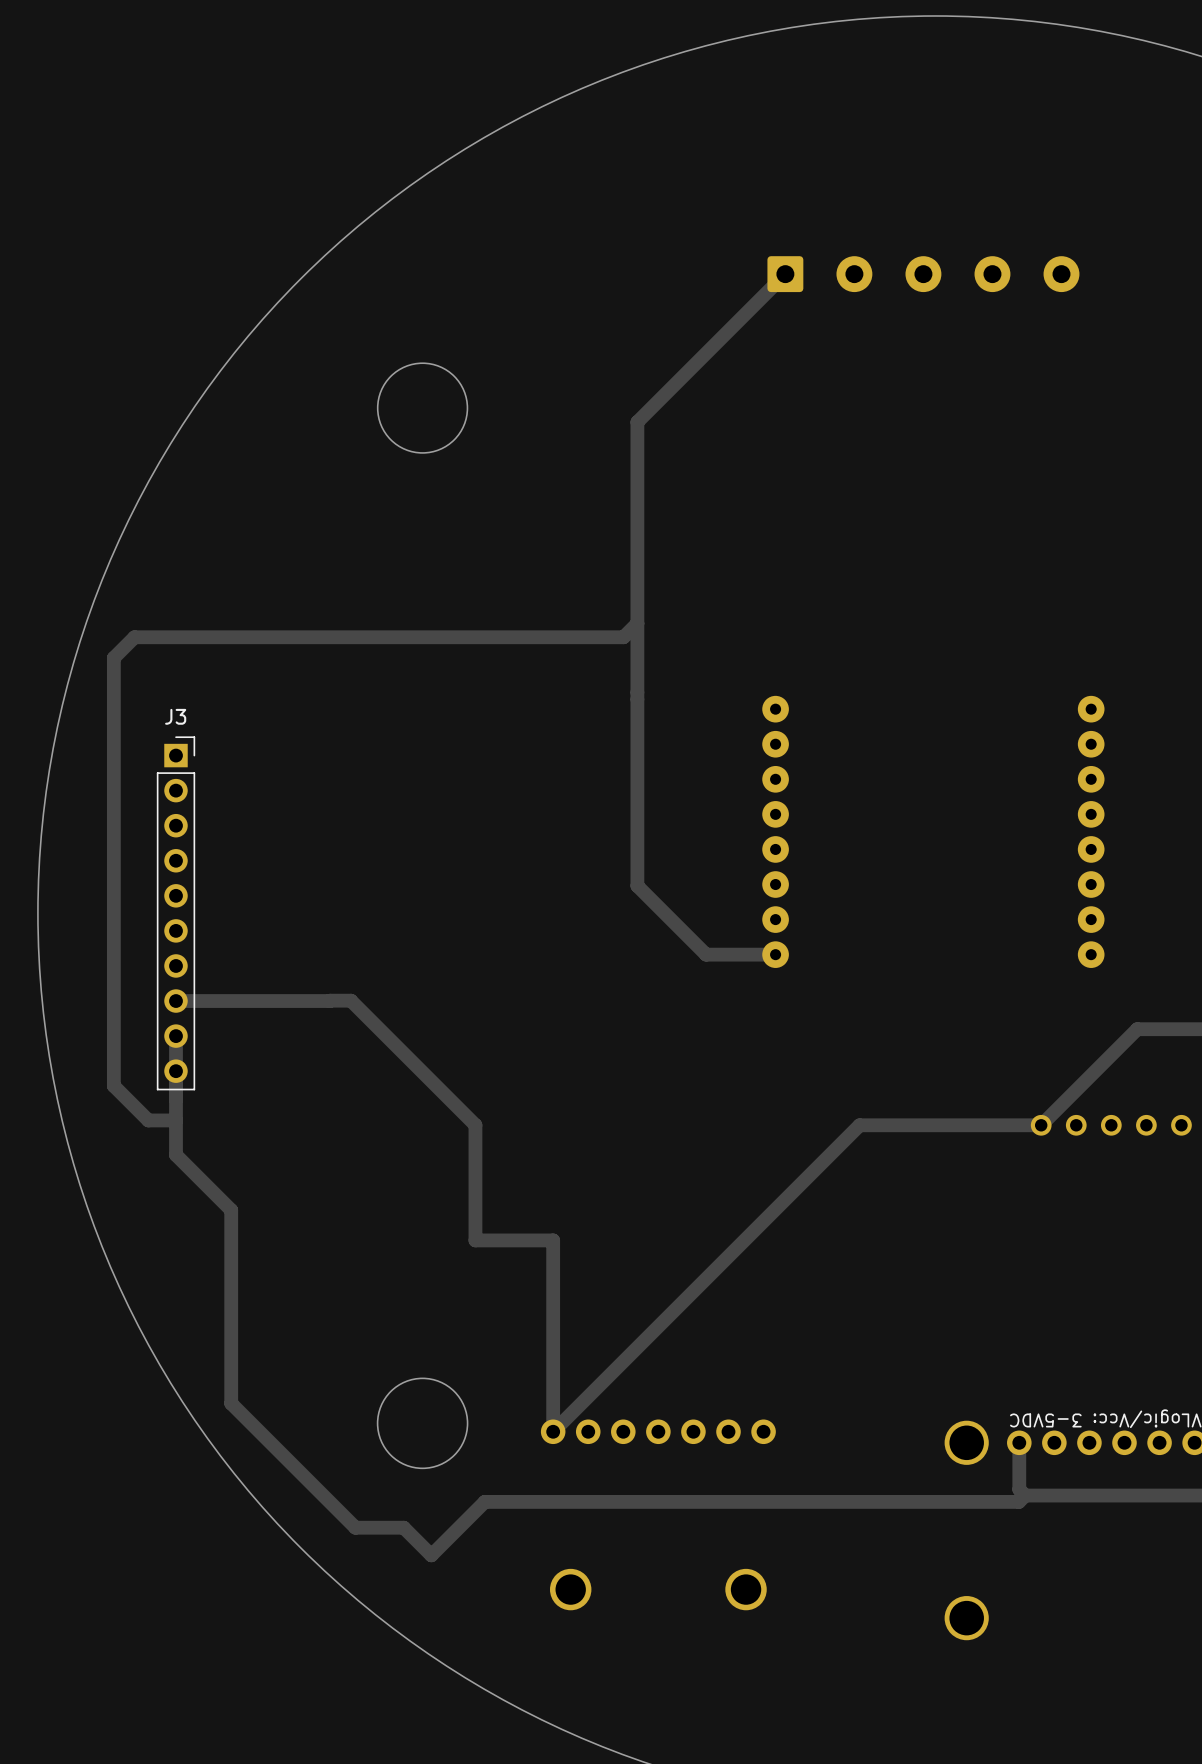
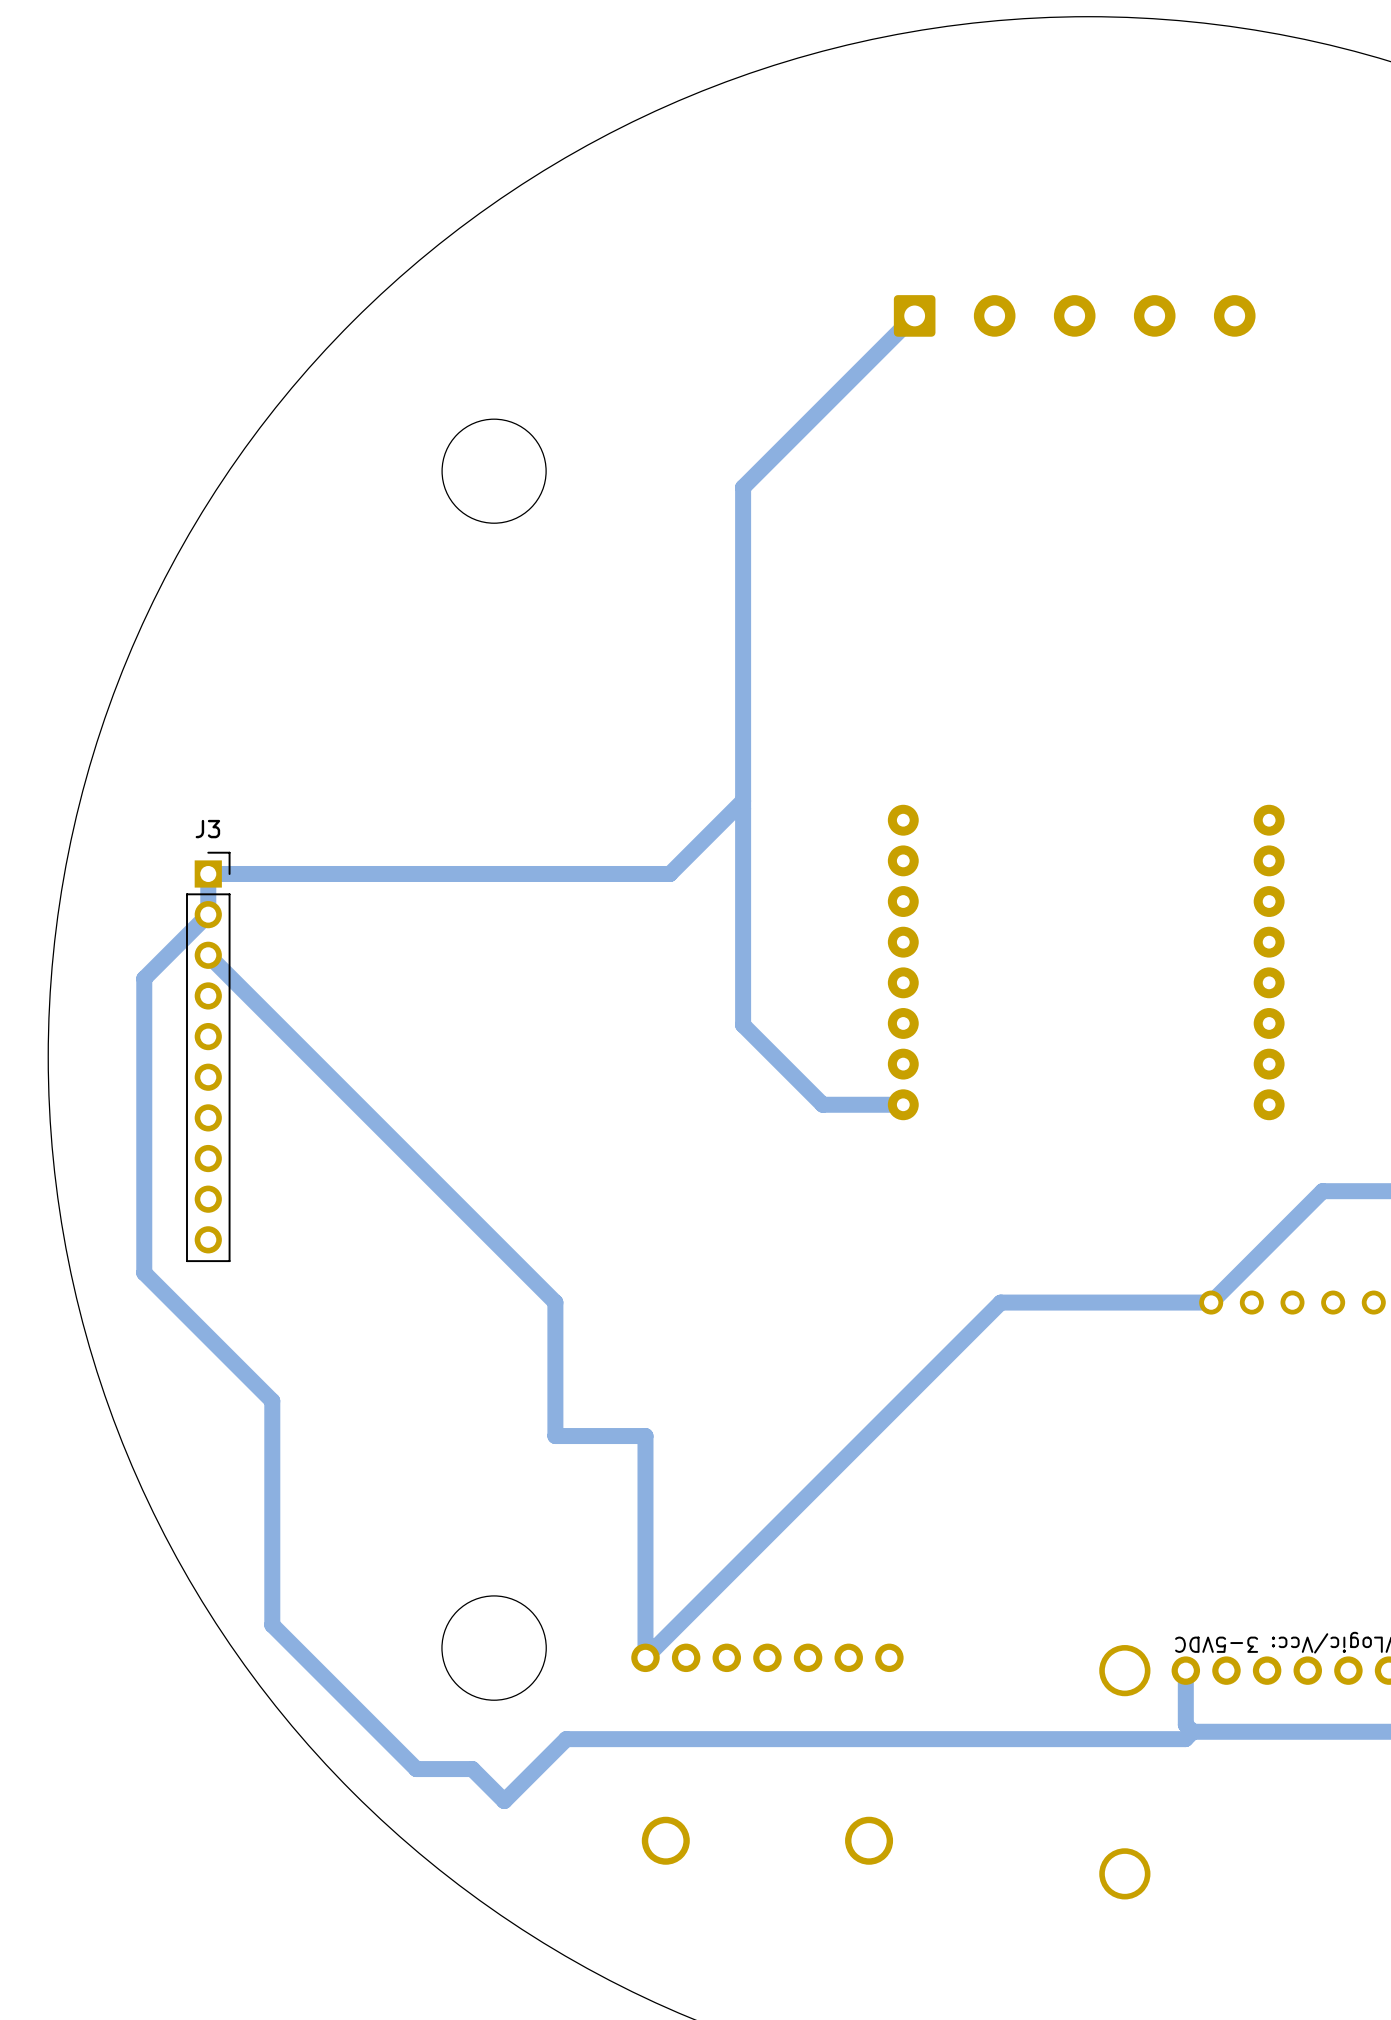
track: (637, 623) (623, 637) (134, 637) (113, 657) (113, 1085) (148, 1120) (175, 1120) -> none
track: (350, 1000) (175, 1001) -> (411, 1158) (208, 955)
track: (175, 1071) (175, 1036) (175, 1154) -> (743, 800) (669, 873) (208, 873) (208, 914) (144, 978) (144, 1272) (208, 1336)

